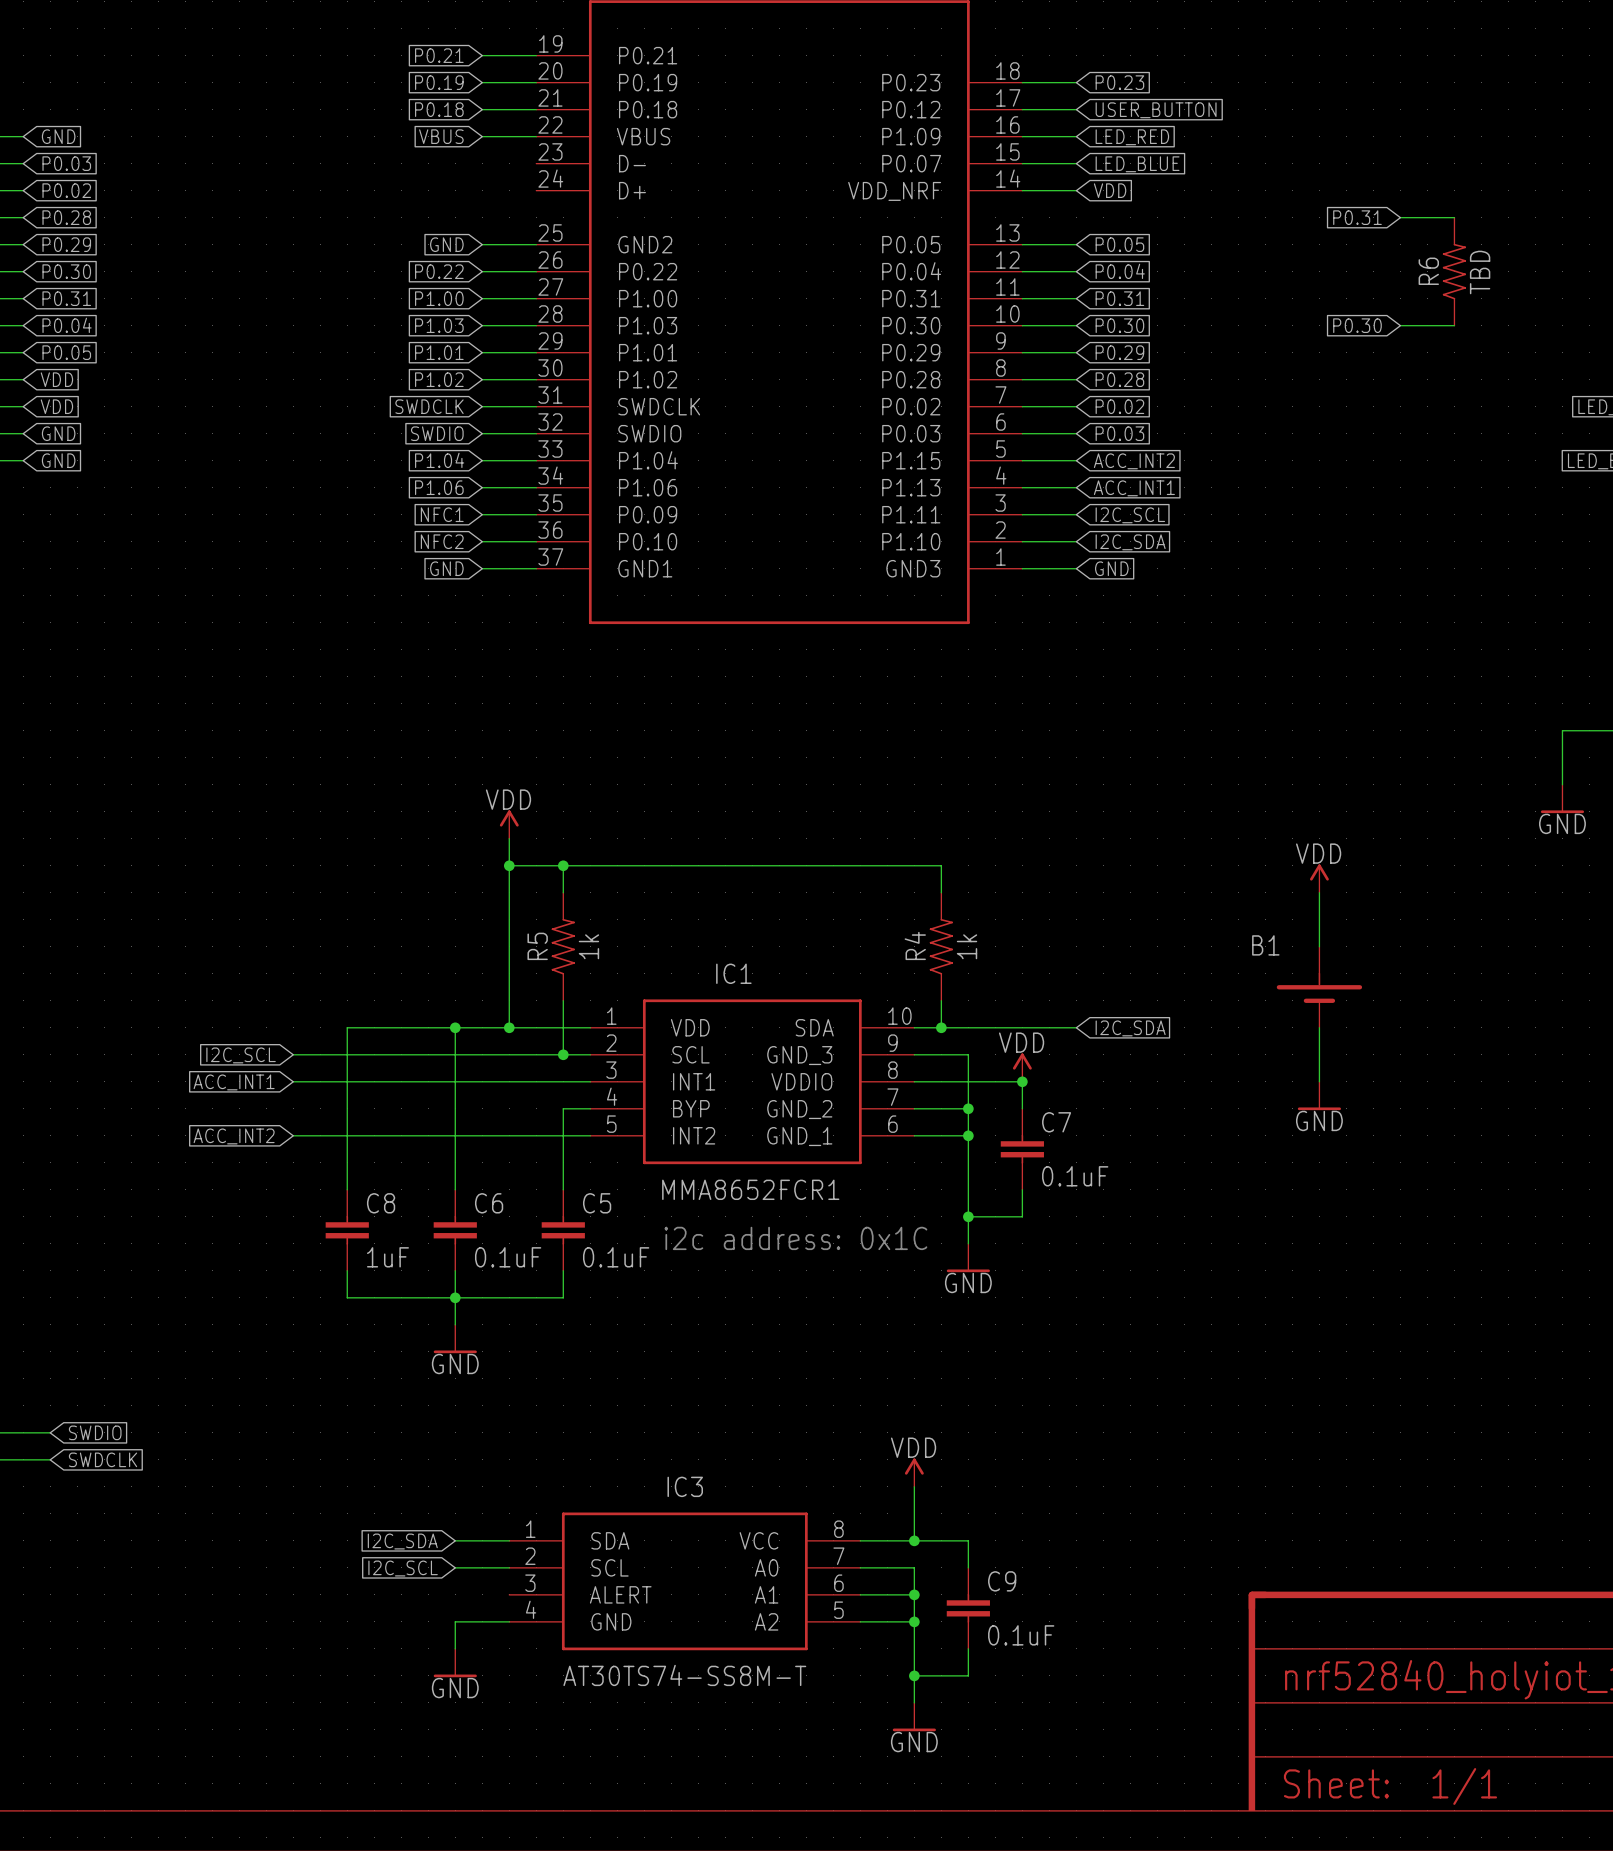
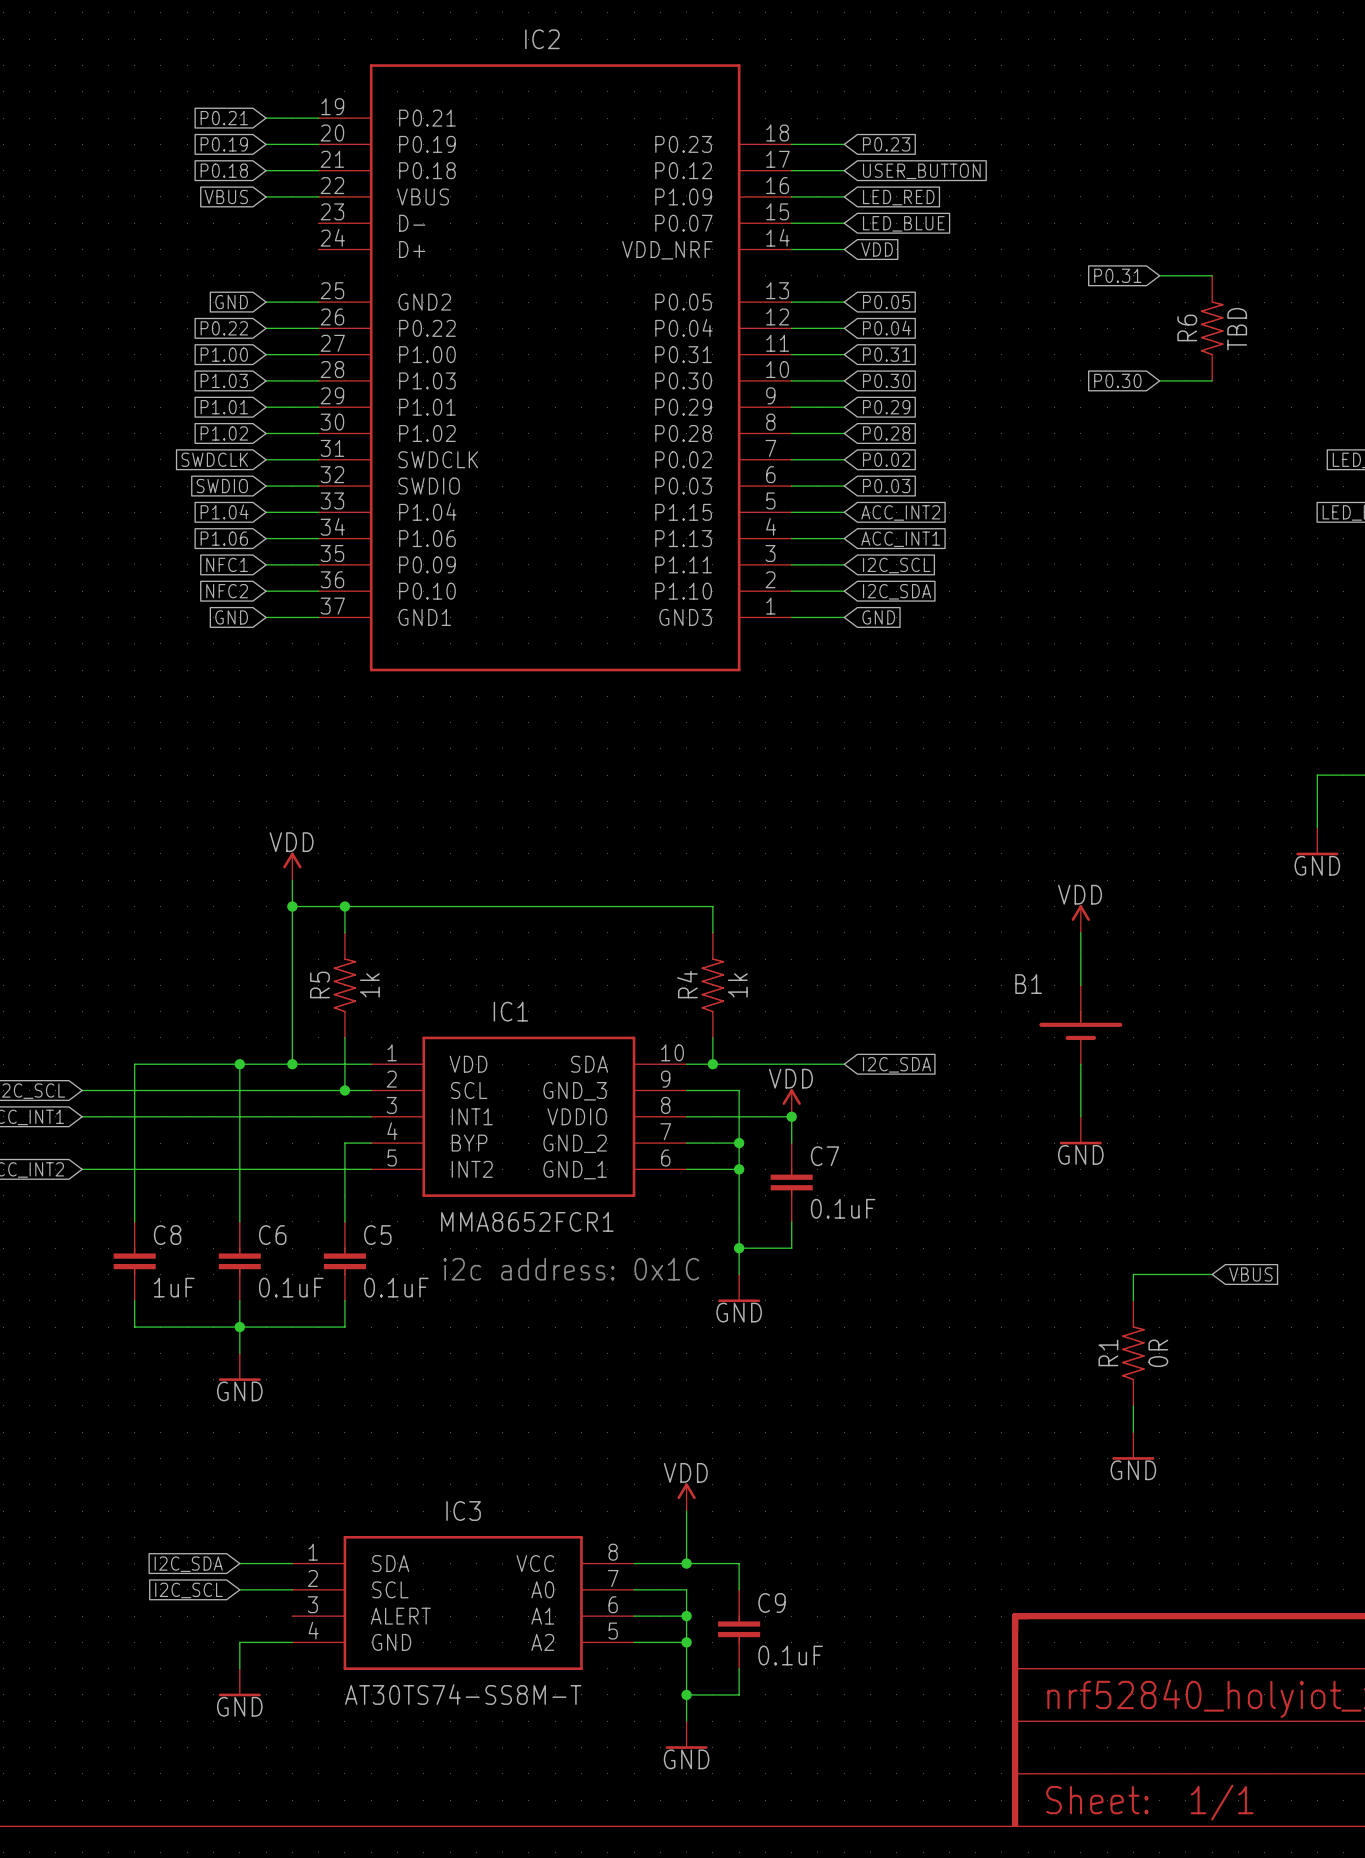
wire: none -> (1212, 1274) (1133, 1274) (1133, 1300)
global label: none -> VBUS (1250, 1274)
R1: none -> 0R (1133, 1353)
wire: none -> (1133, 1405) (1133, 1432)
power symbol: none -> GND (1133, 1445)

